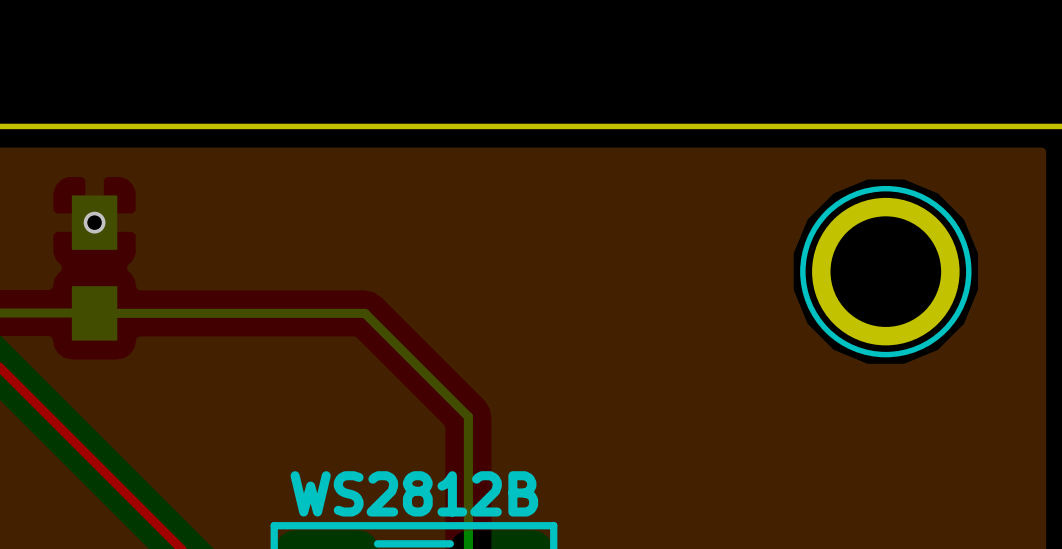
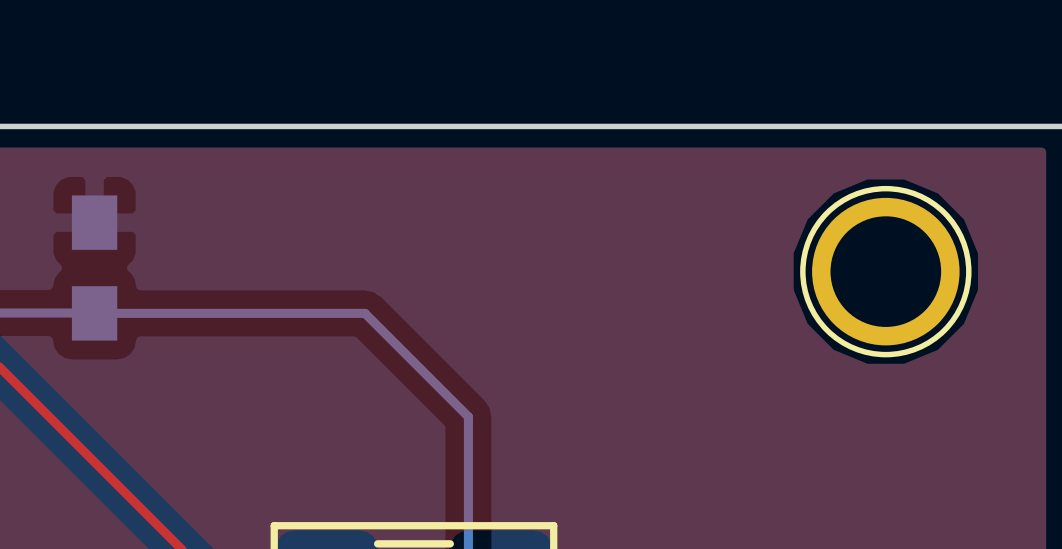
via: (94, 222) -> none
text: WS2812B (414, 493) -> none

